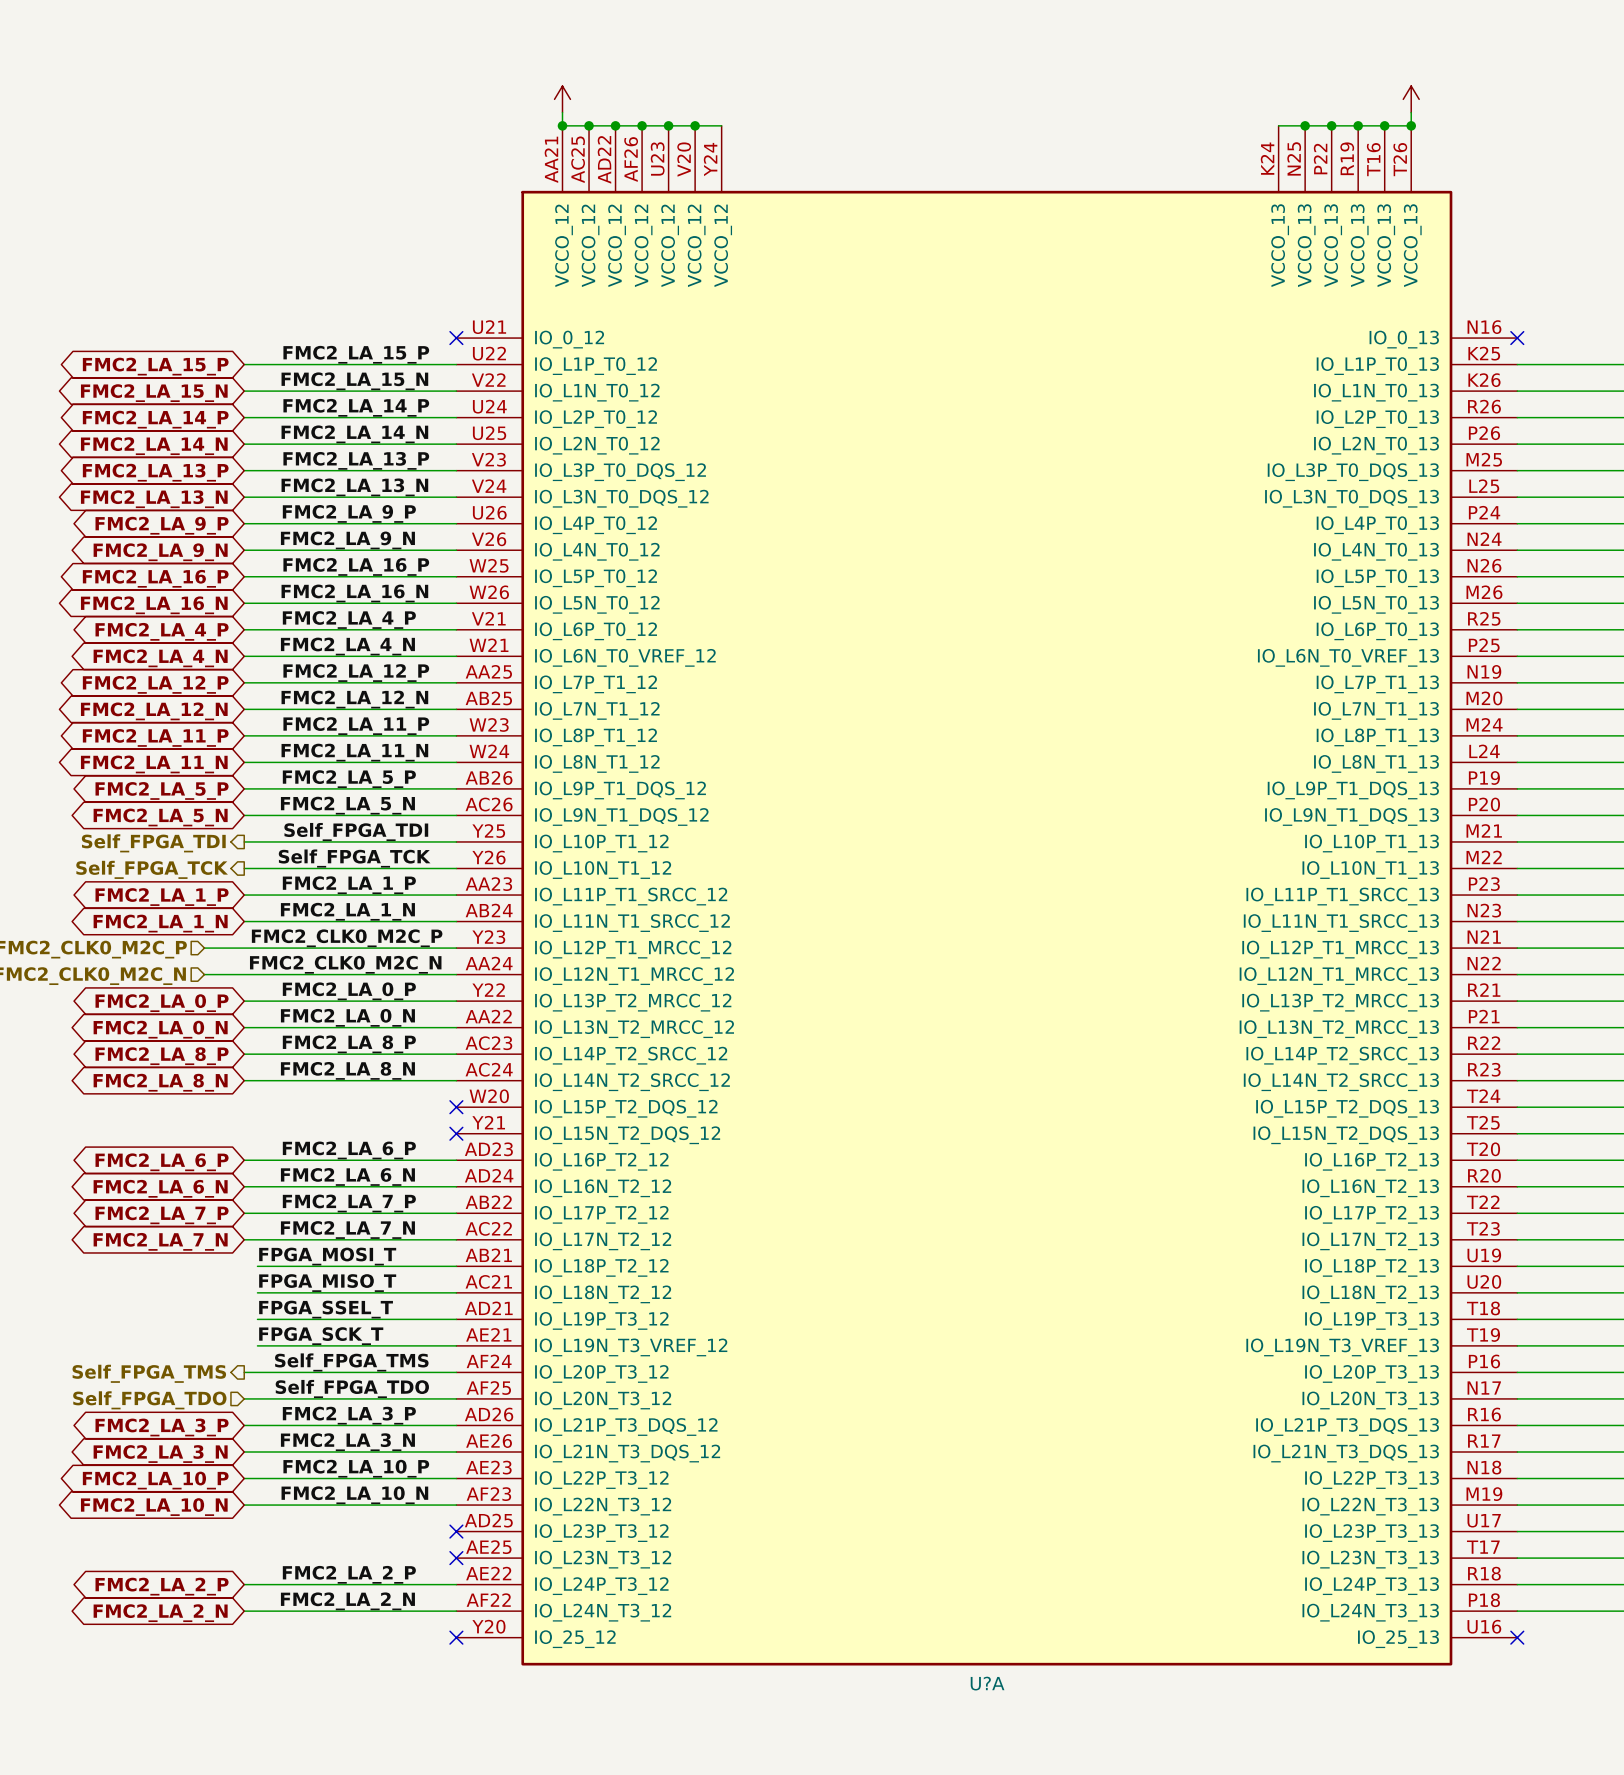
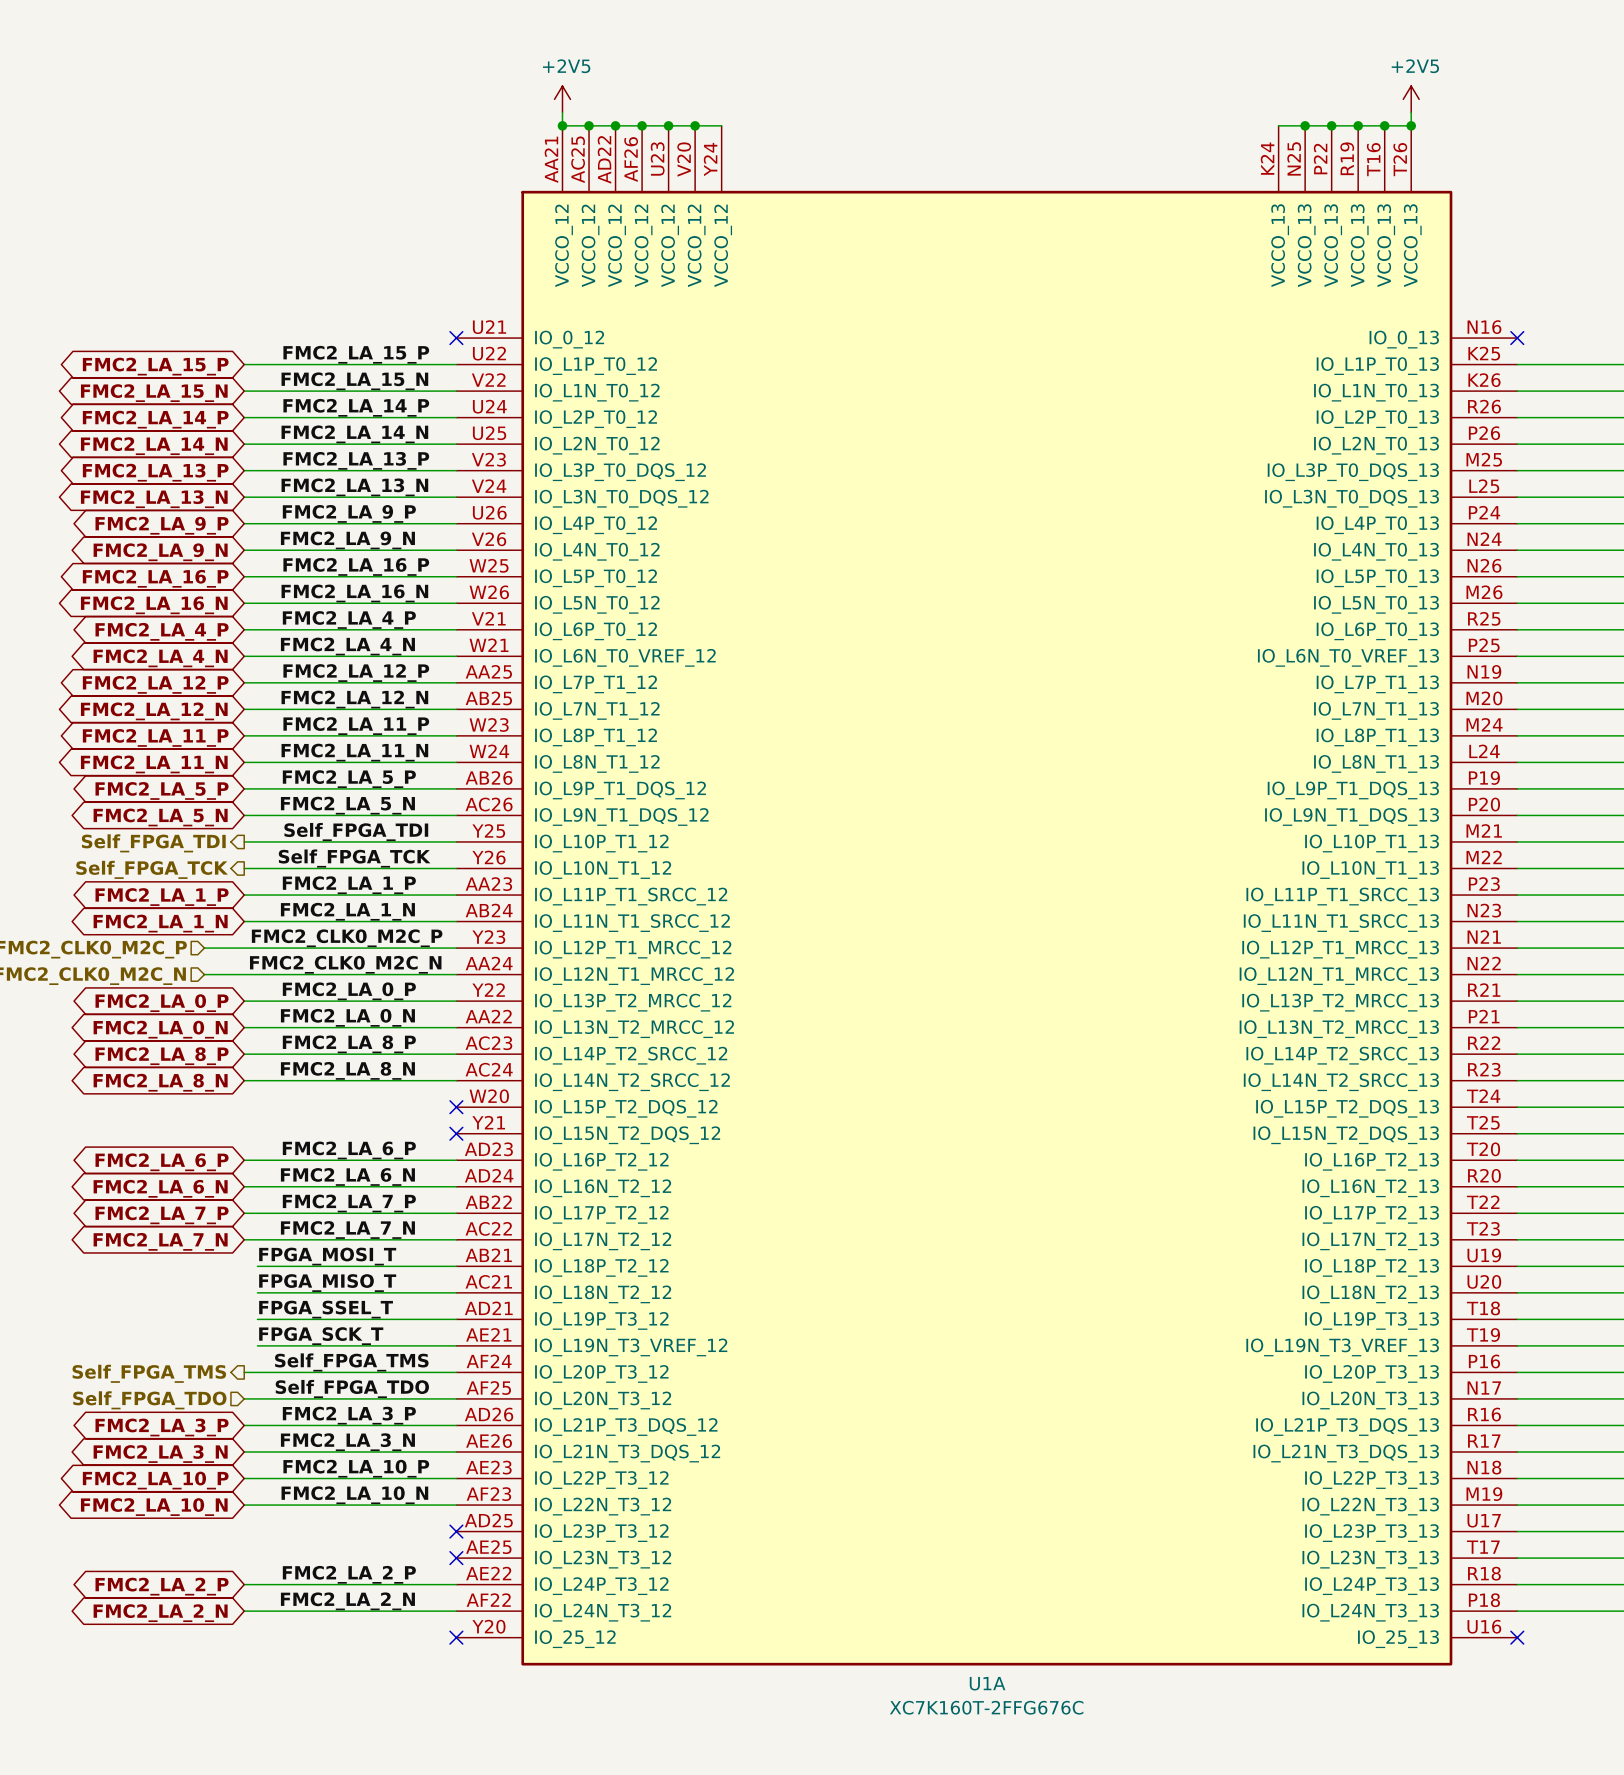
power symbol text: none -> +2V5 (566, 66)
power symbol text: none -> +2V5 (1415, 66)
U?A name: U?A (987, 1683) -> U1A (987, 1683)
U?A value: none -> XC7K160T-2FFG676C (986, 1707)

